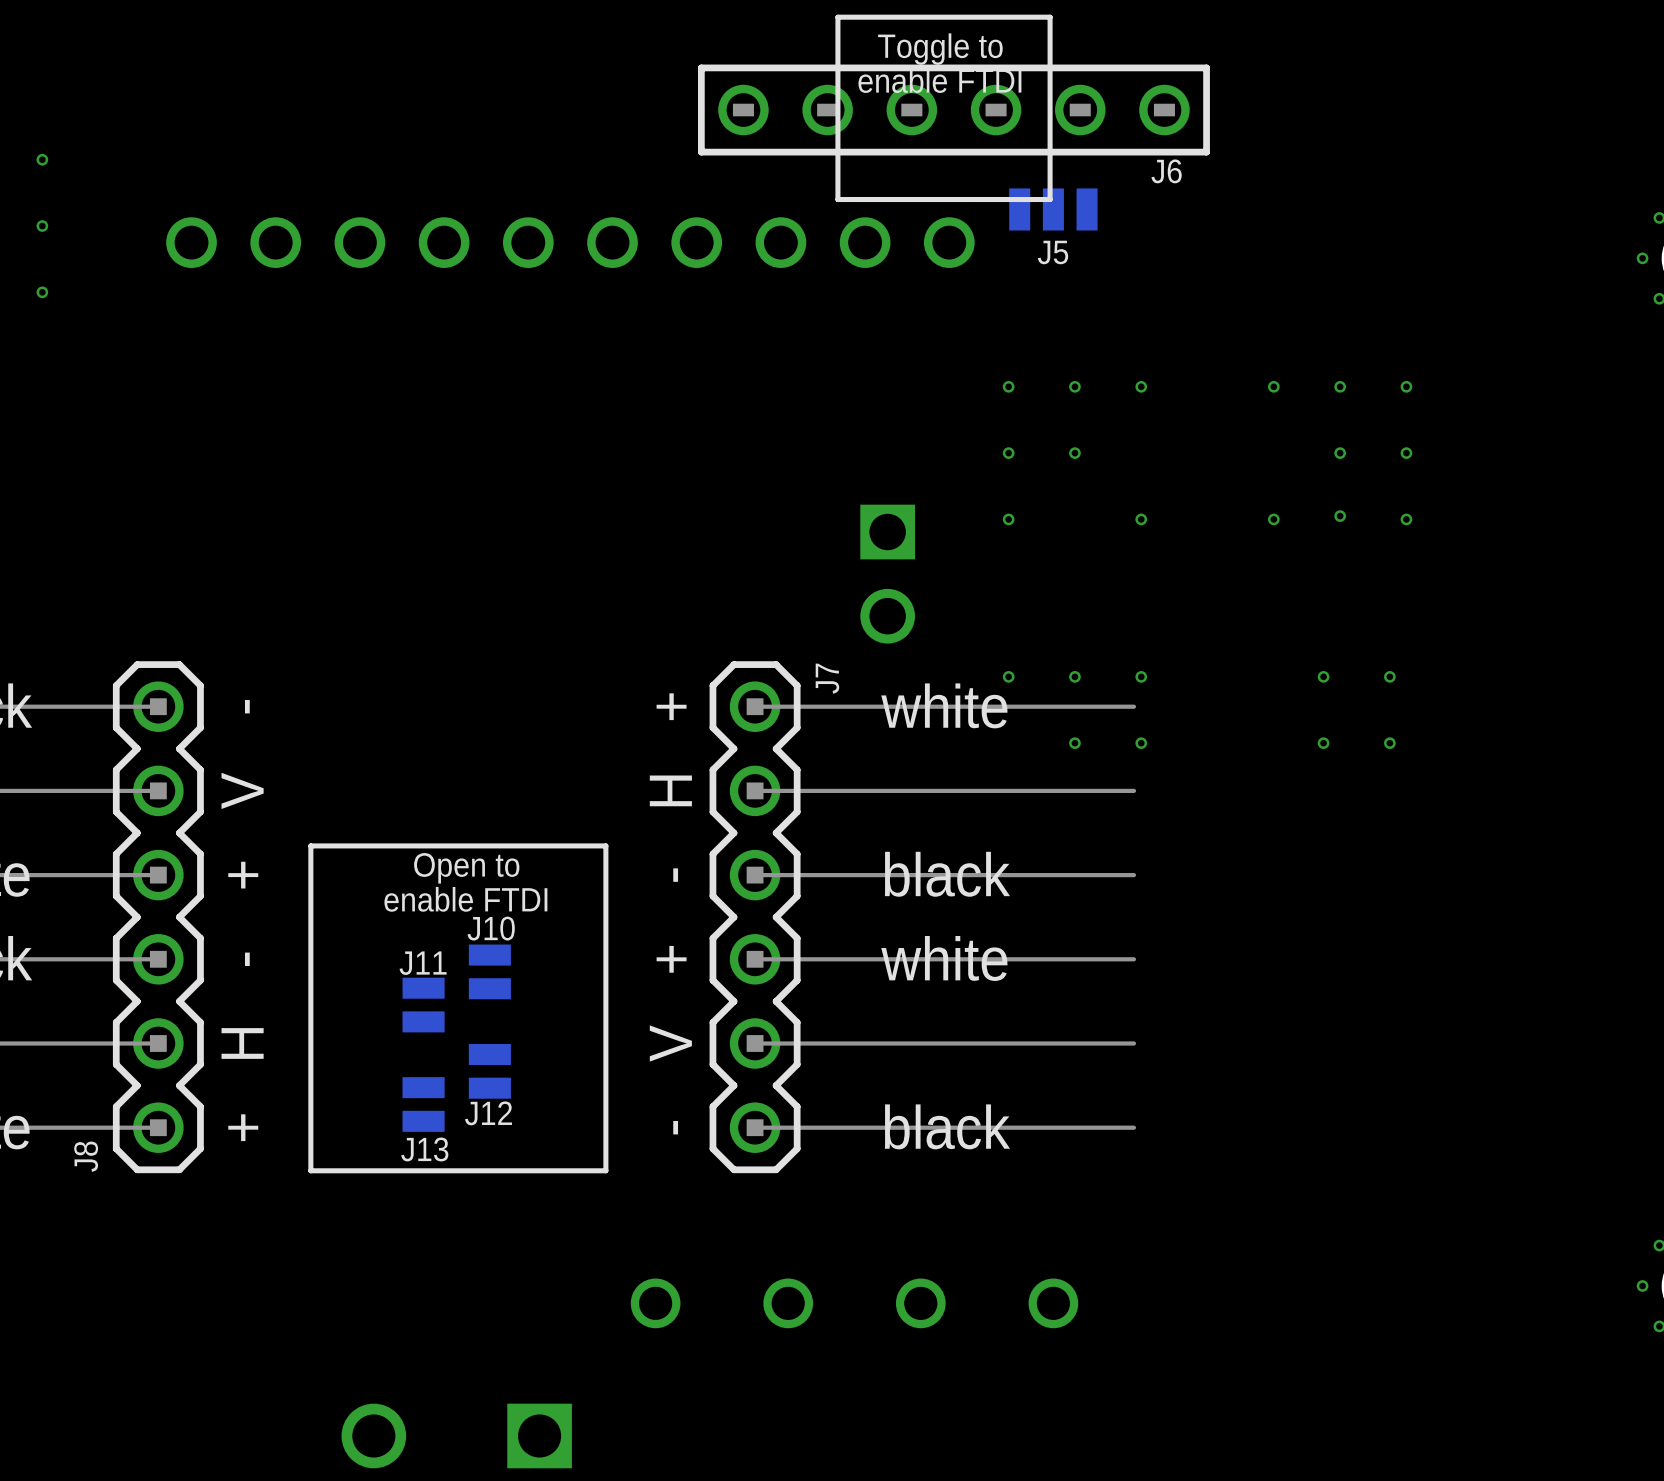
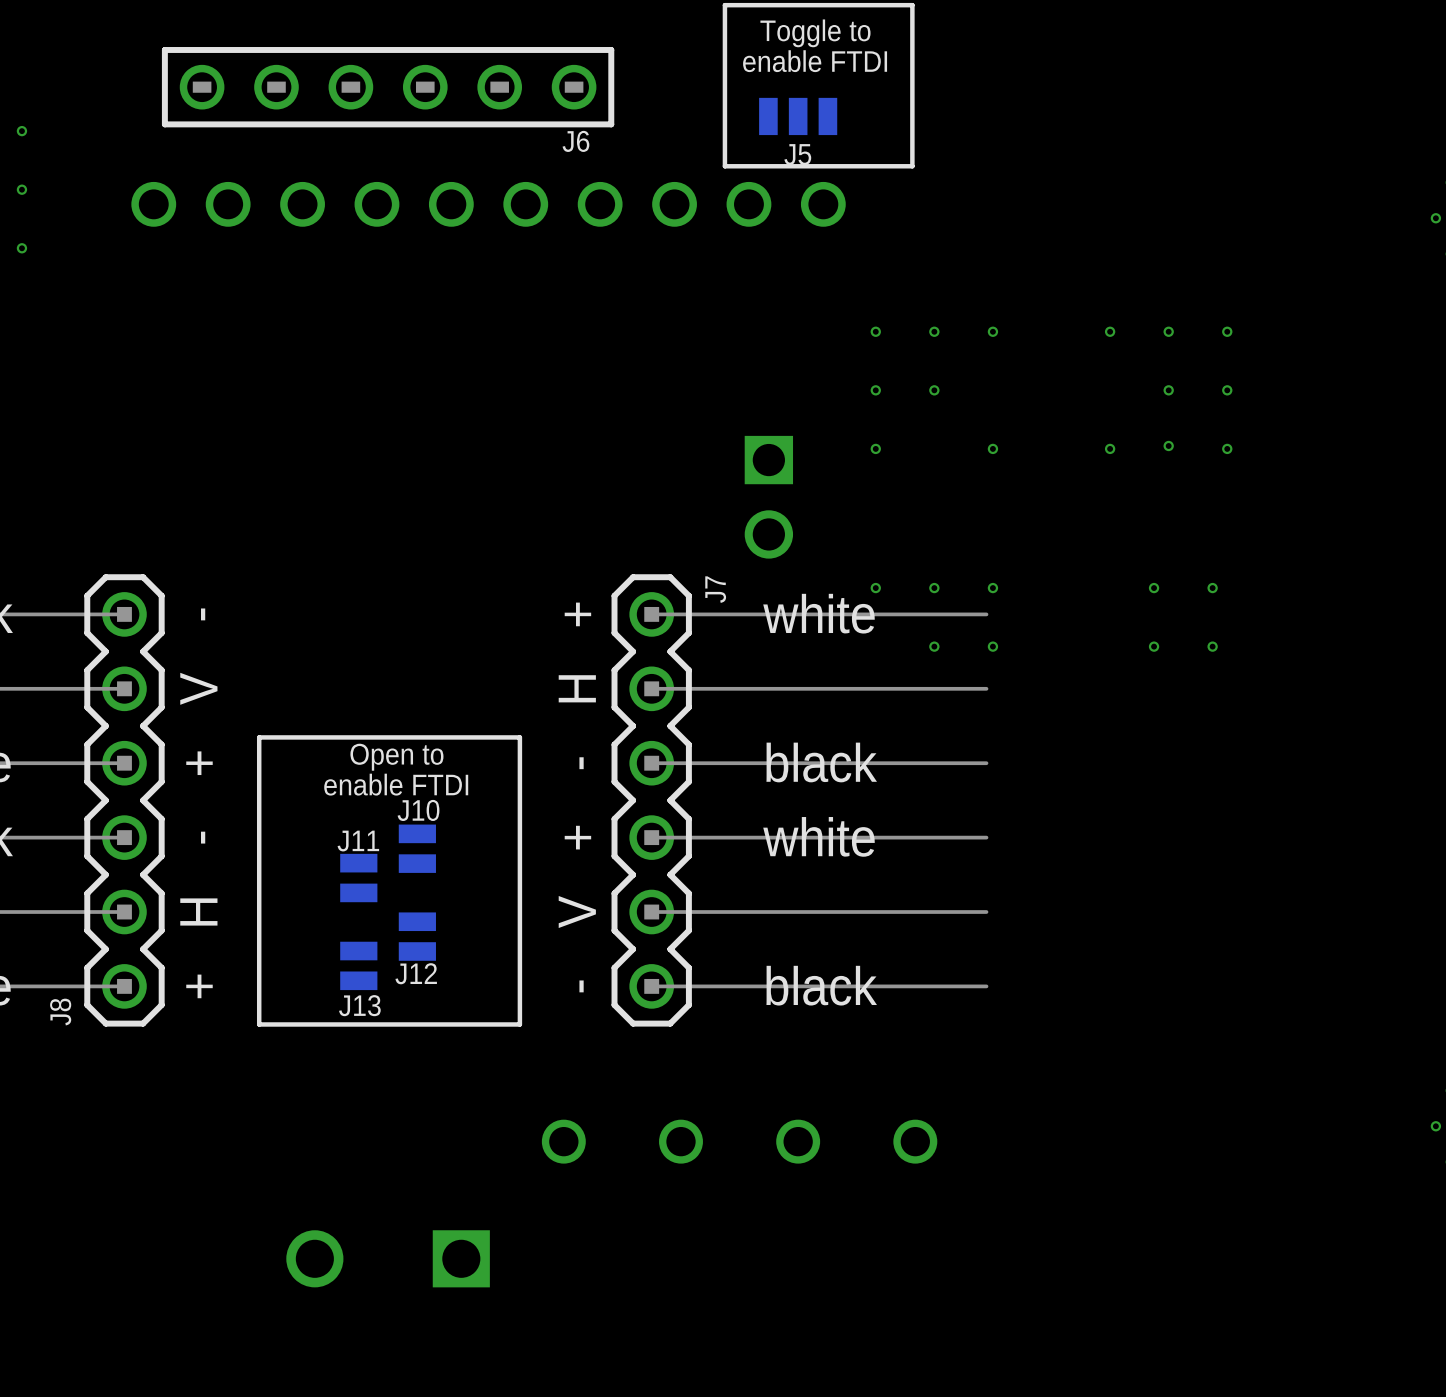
J6 position: (953, 110) -> (388, 87)
J5 position: (1053, 209) -> (798, 116)

